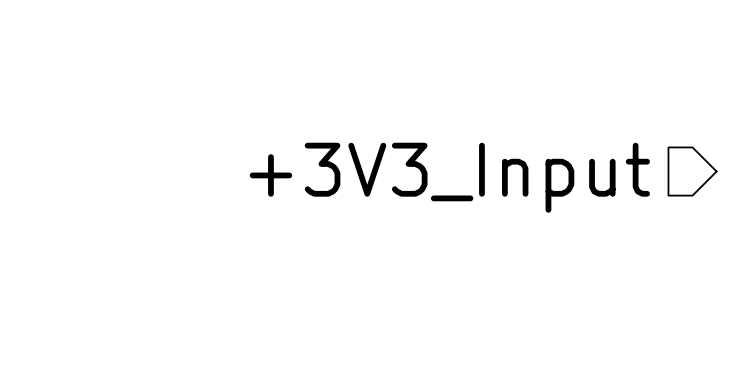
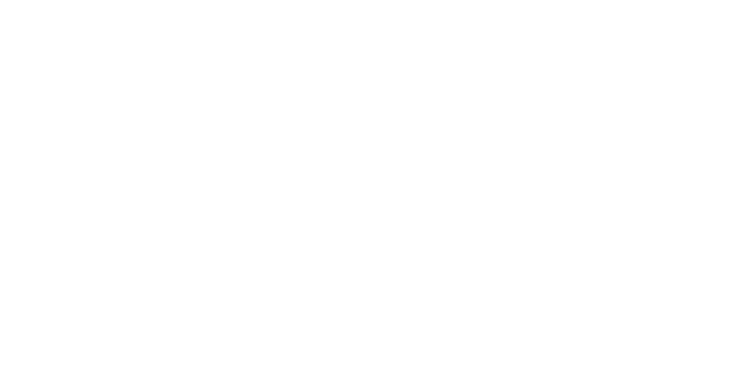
hierarchical label: +3V3_Input (449, 177) -> none

